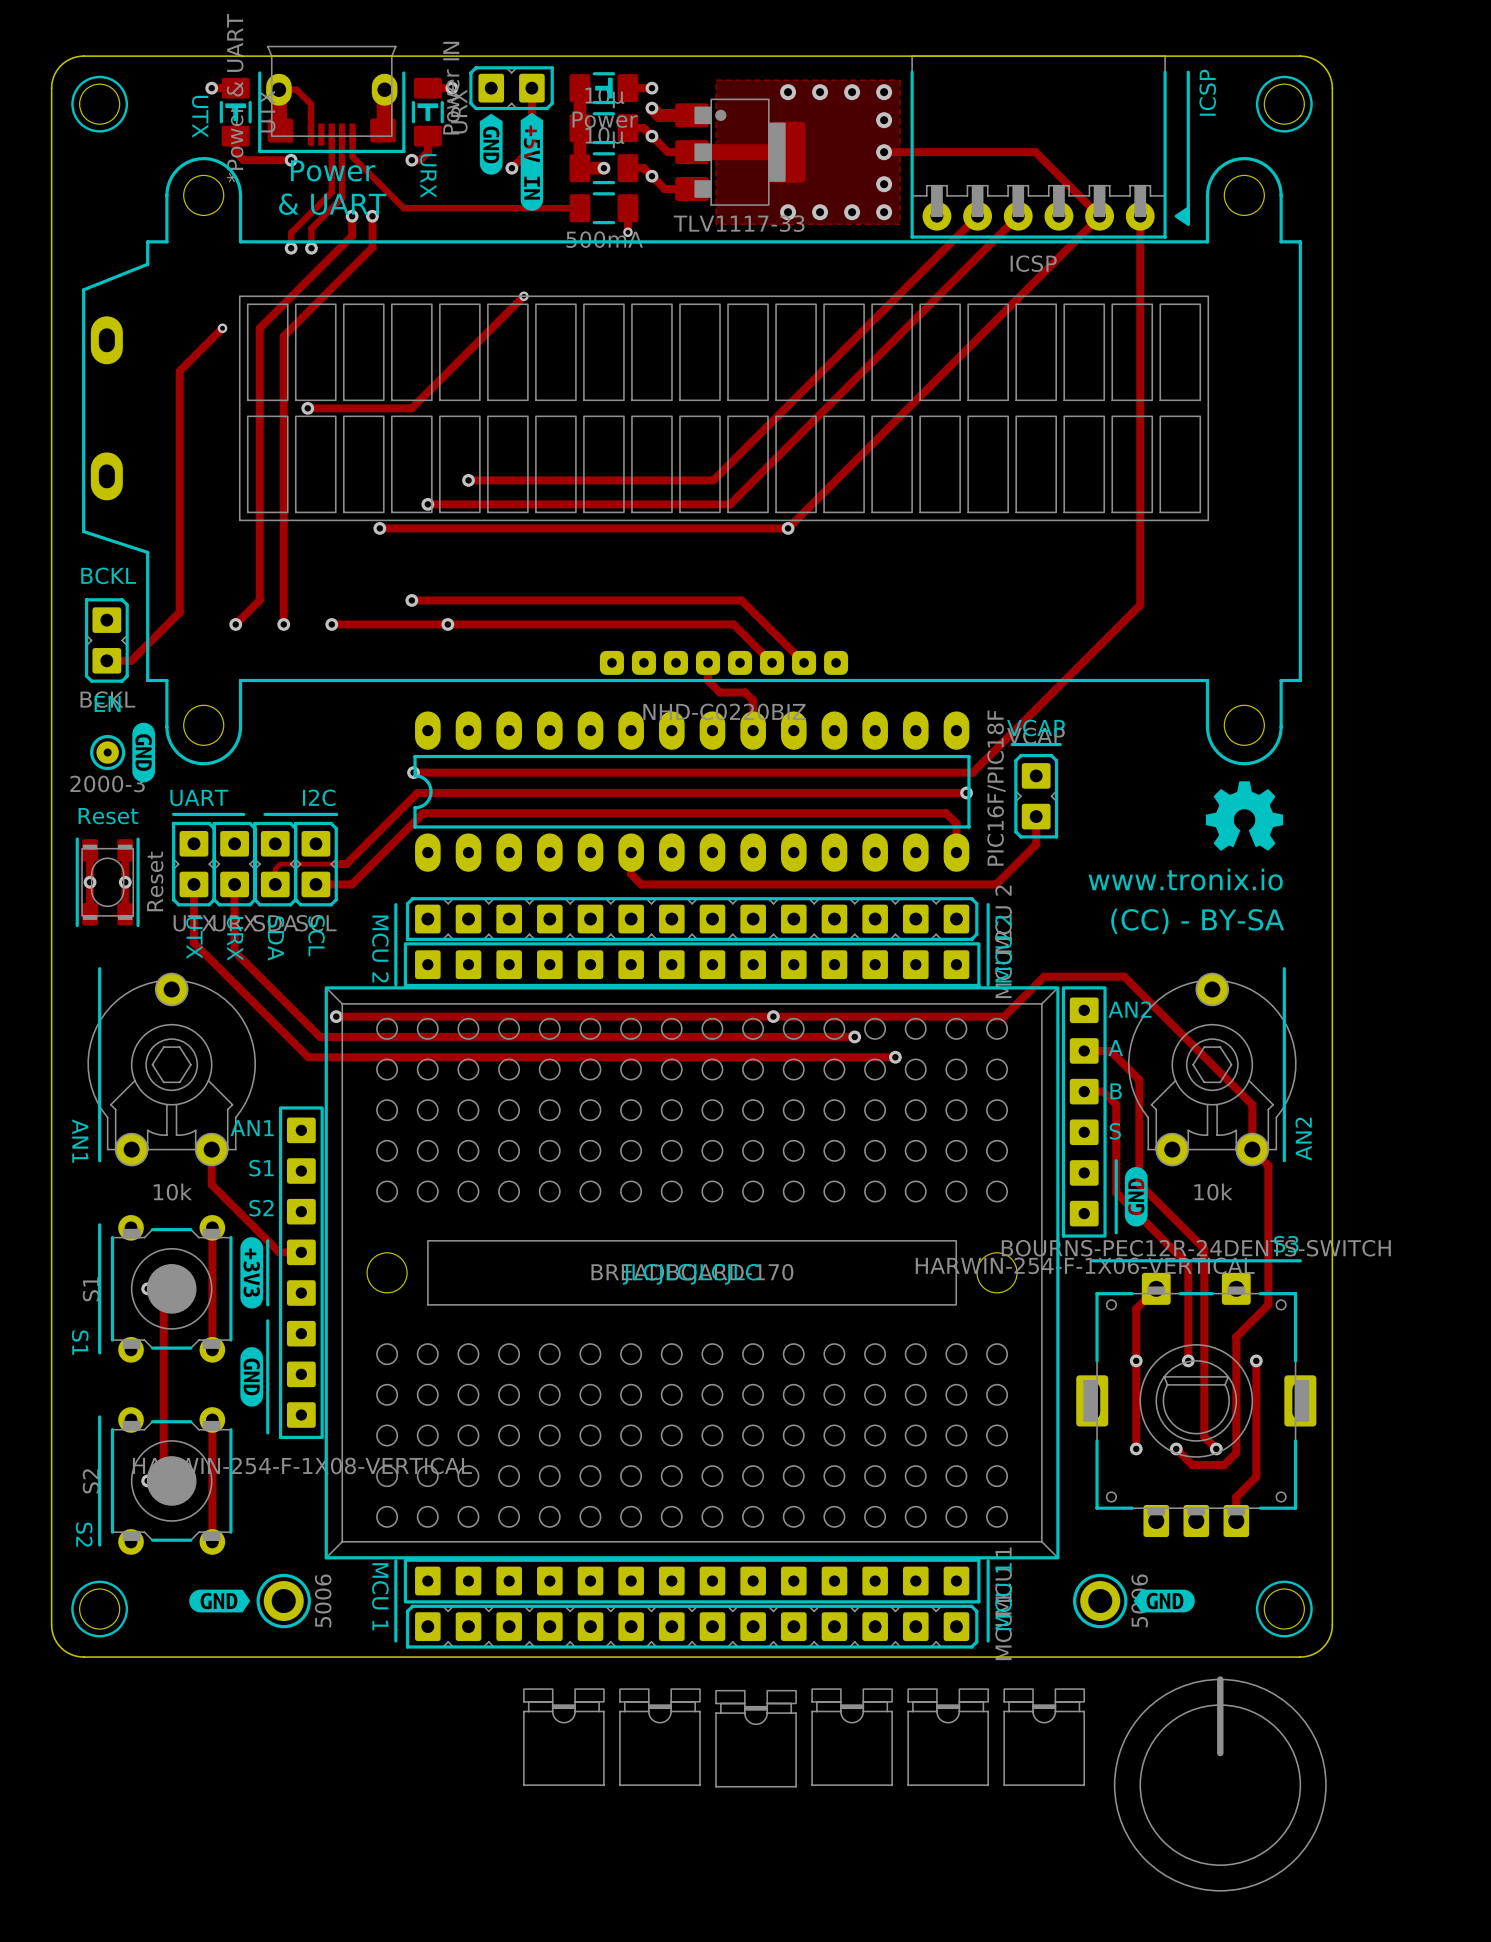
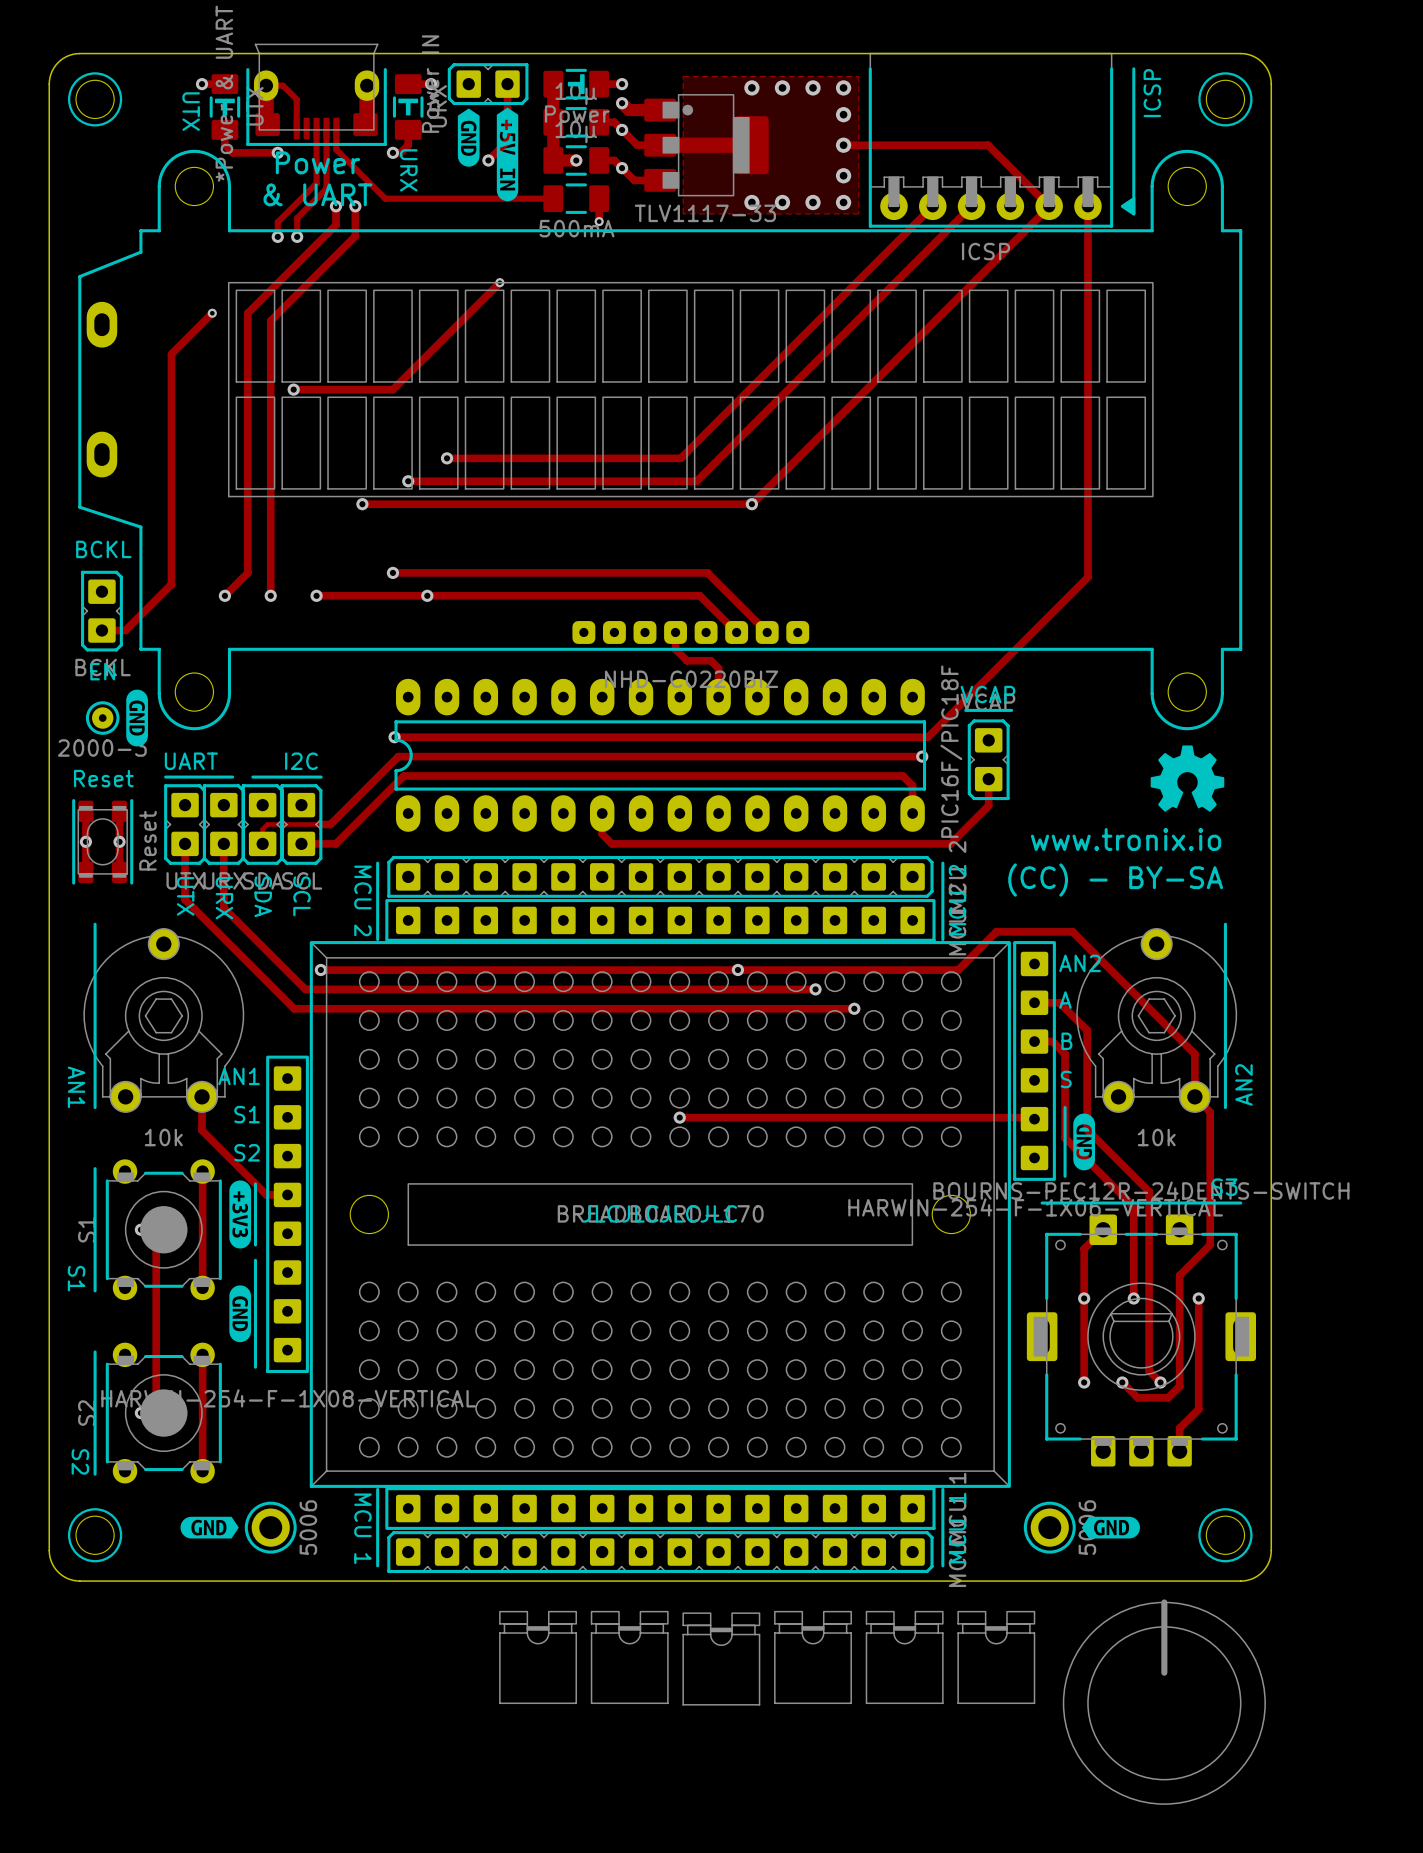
track: none -> (679, 1117) (1032, 1117)
via: none -> (679, 1117)

